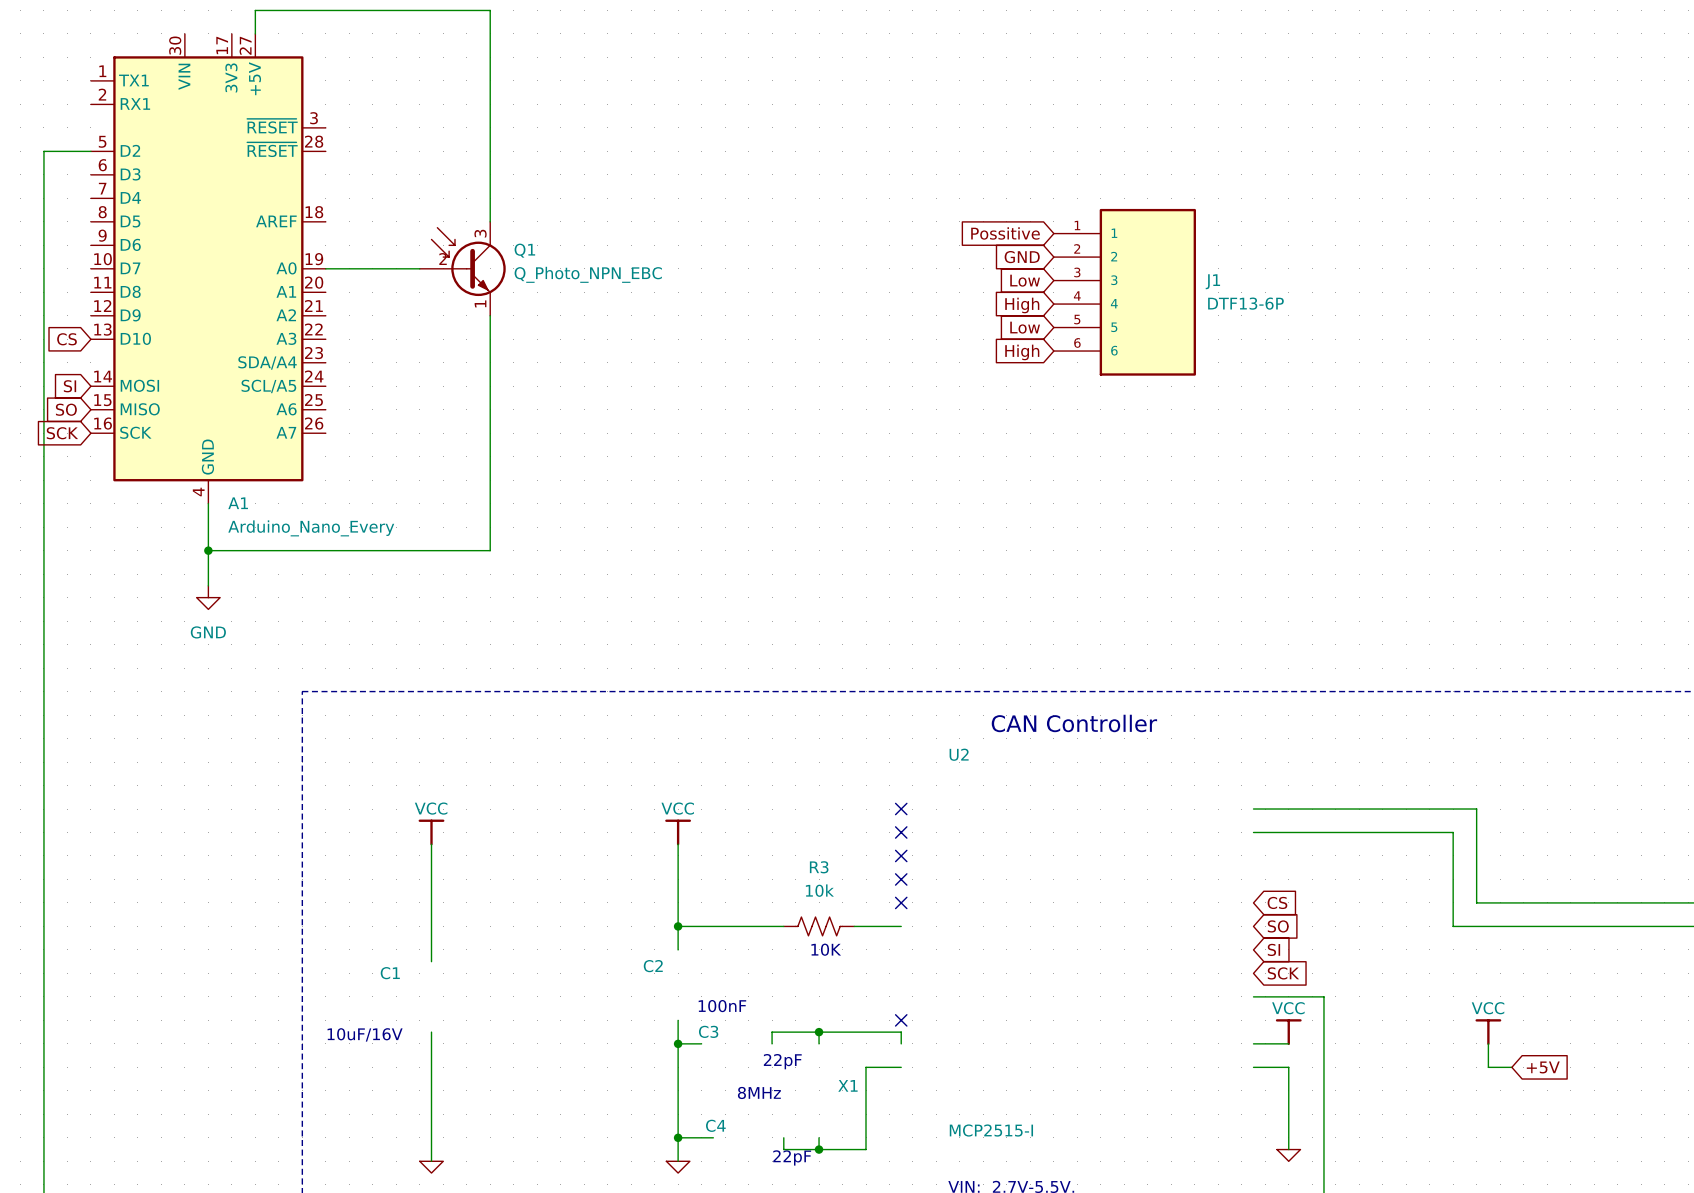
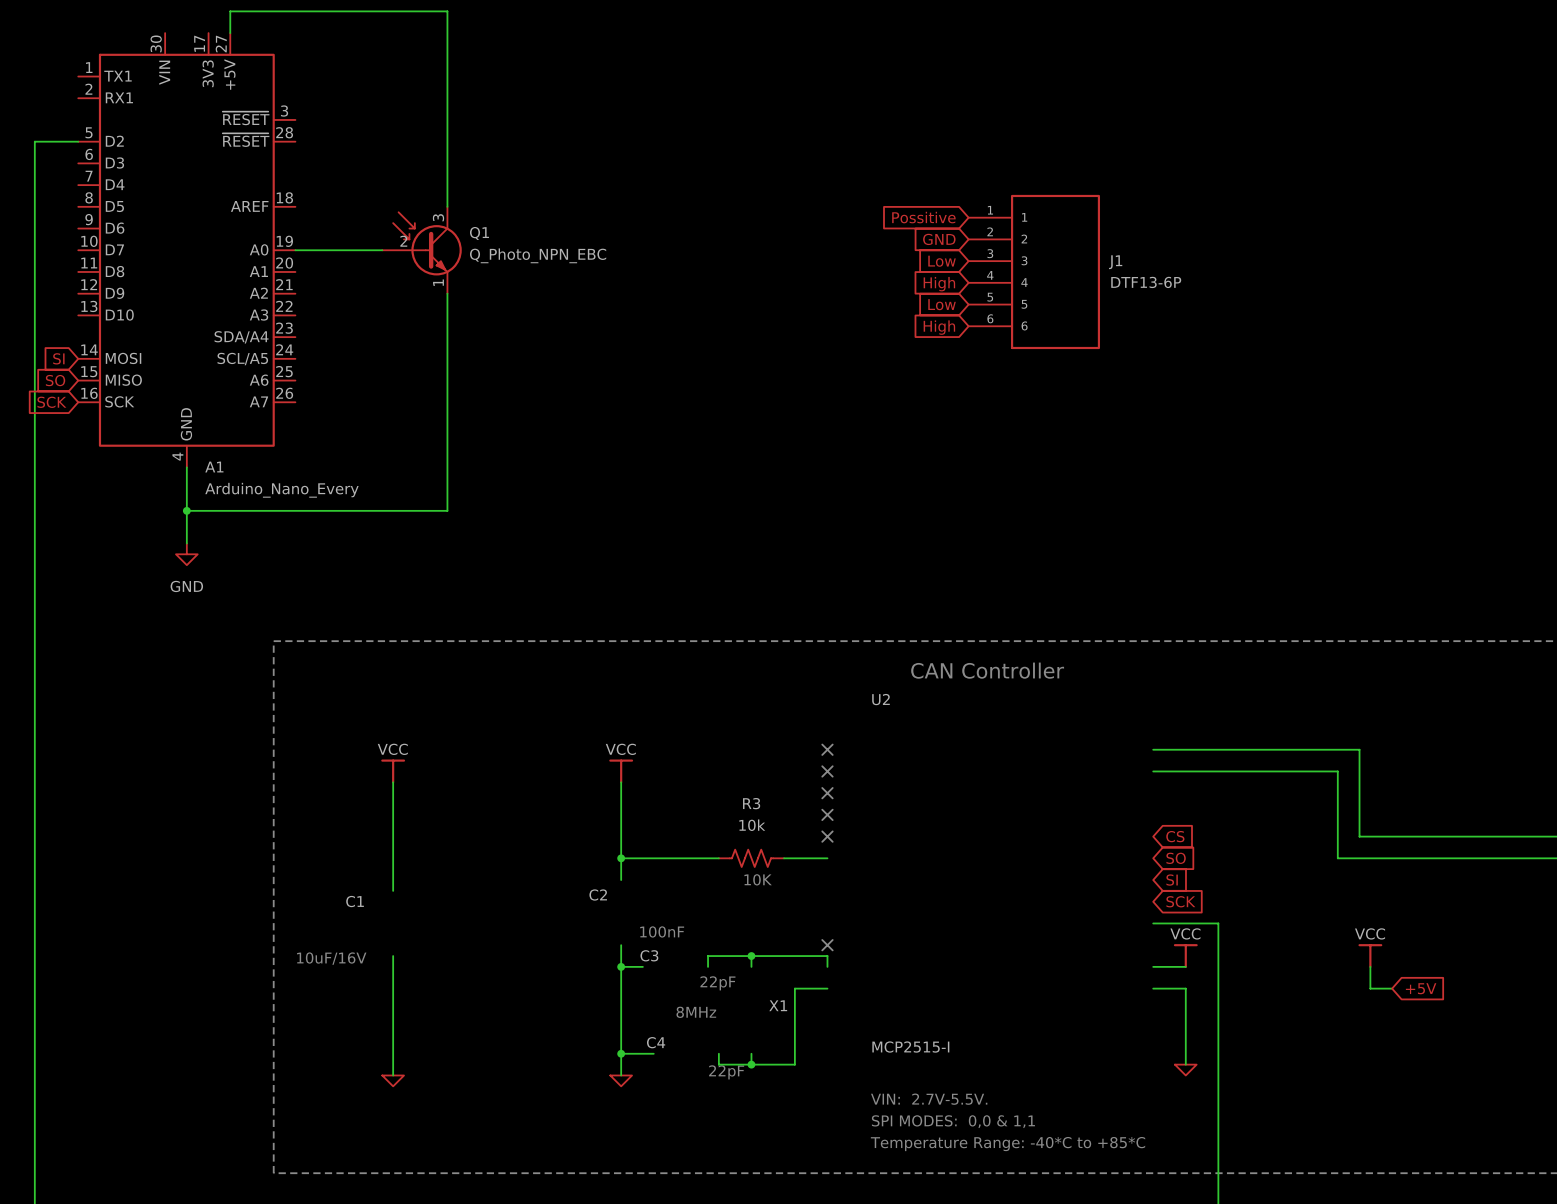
global label: CS (67, 339) -> none

